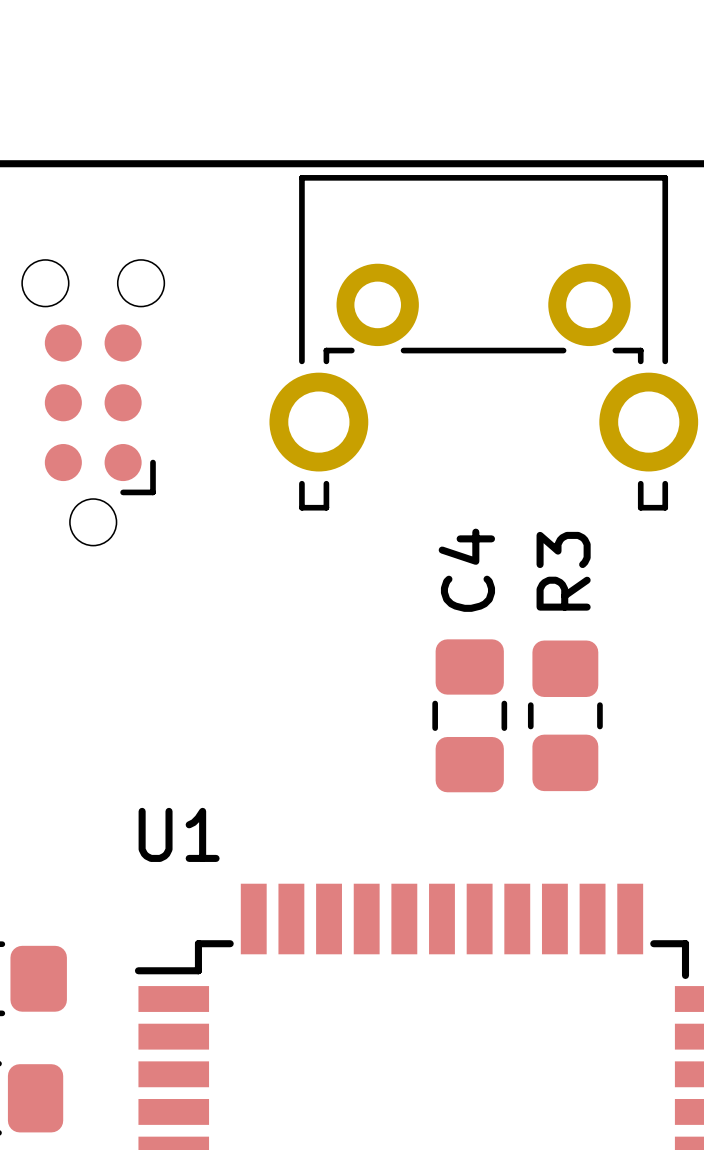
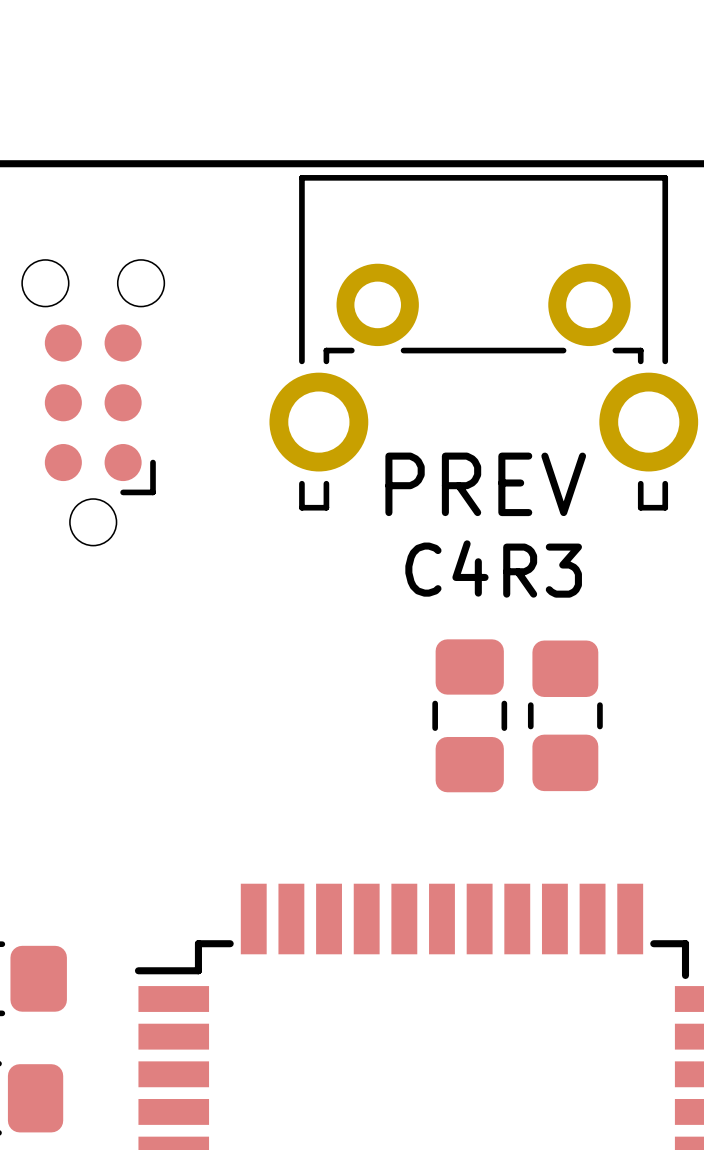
text: none -> PREV (485, 484)
C4 name rotation: 0° (466, 570) -> 90° clockwise (446, 568)
R3 name rotation: 0° (563, 571) -> 90° clockwise (542, 570)
U1 name: U1 (179, 834) -> none

